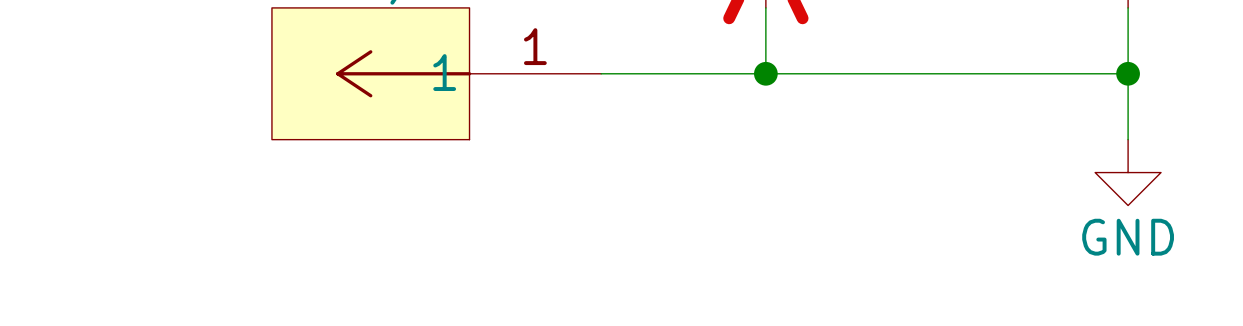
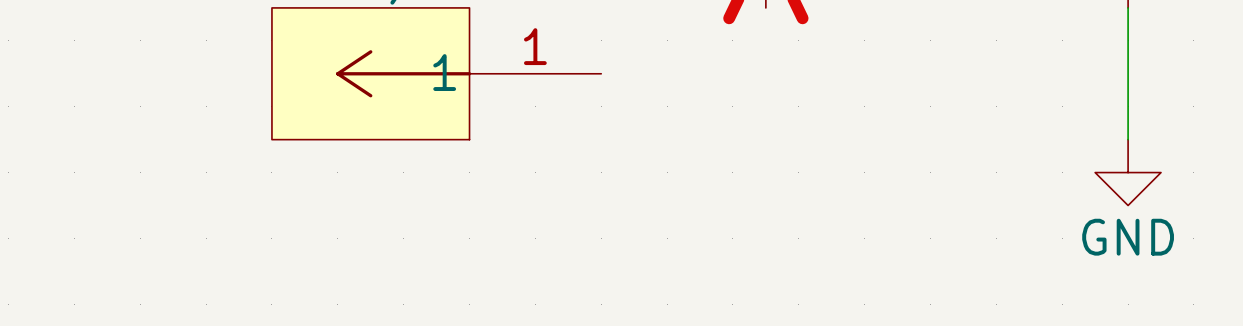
wire: (765, 7) (765, 73) -> none
wire: (601, 73) (1128, 73) -> none
junction: (765, 73) -> none
junction: (1128, 73) -> none

